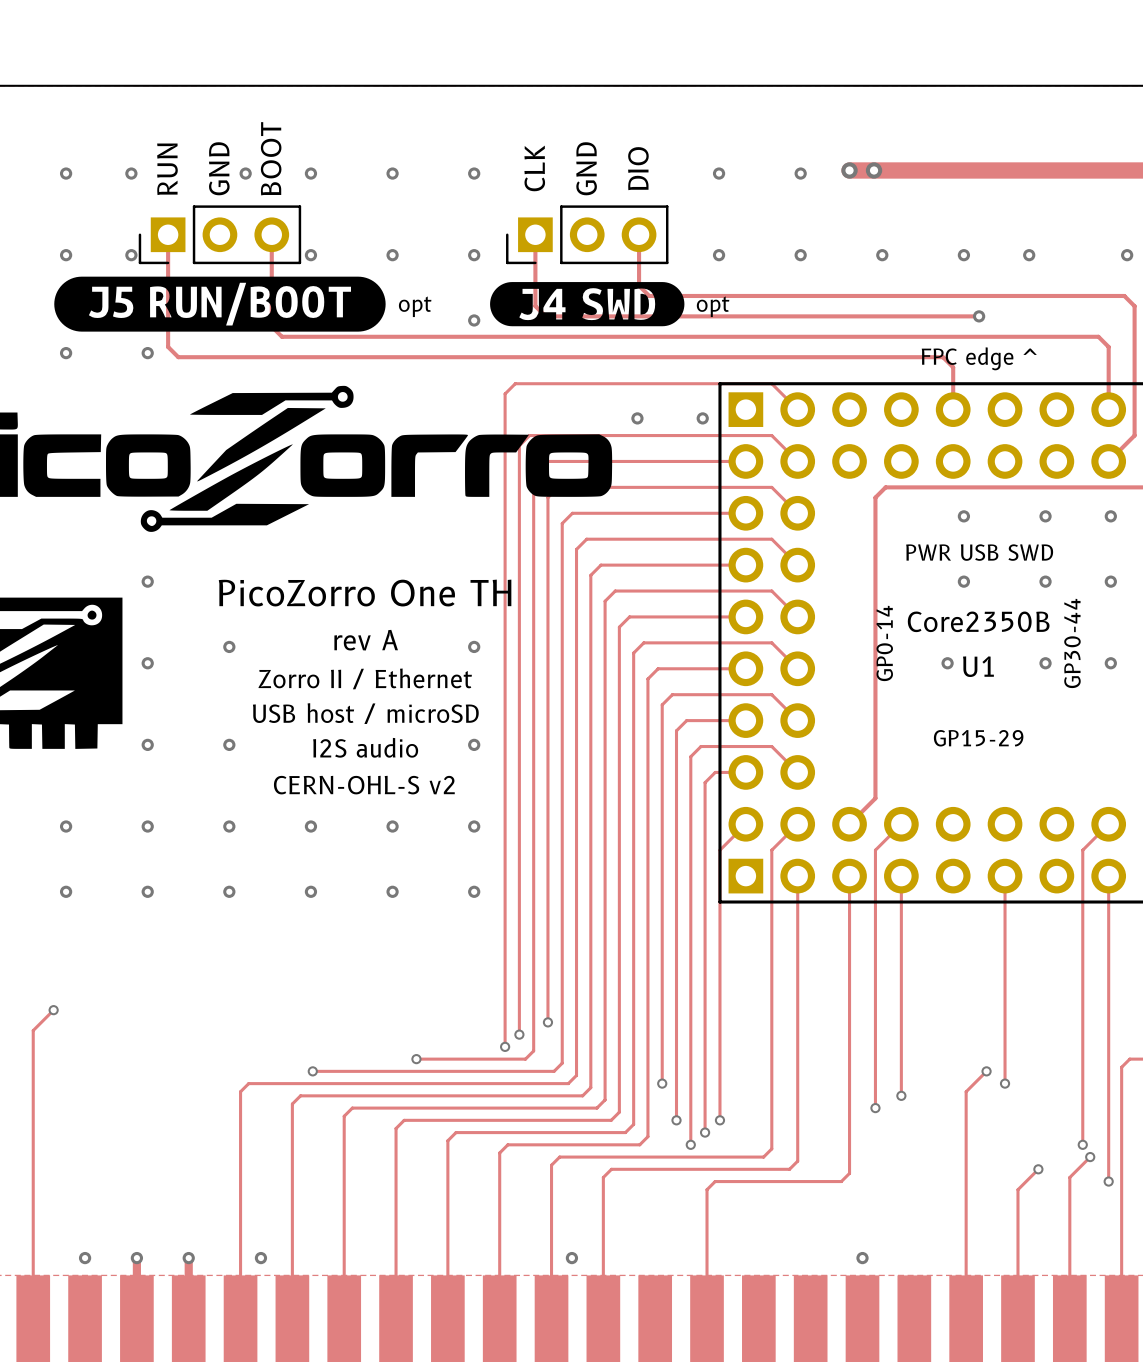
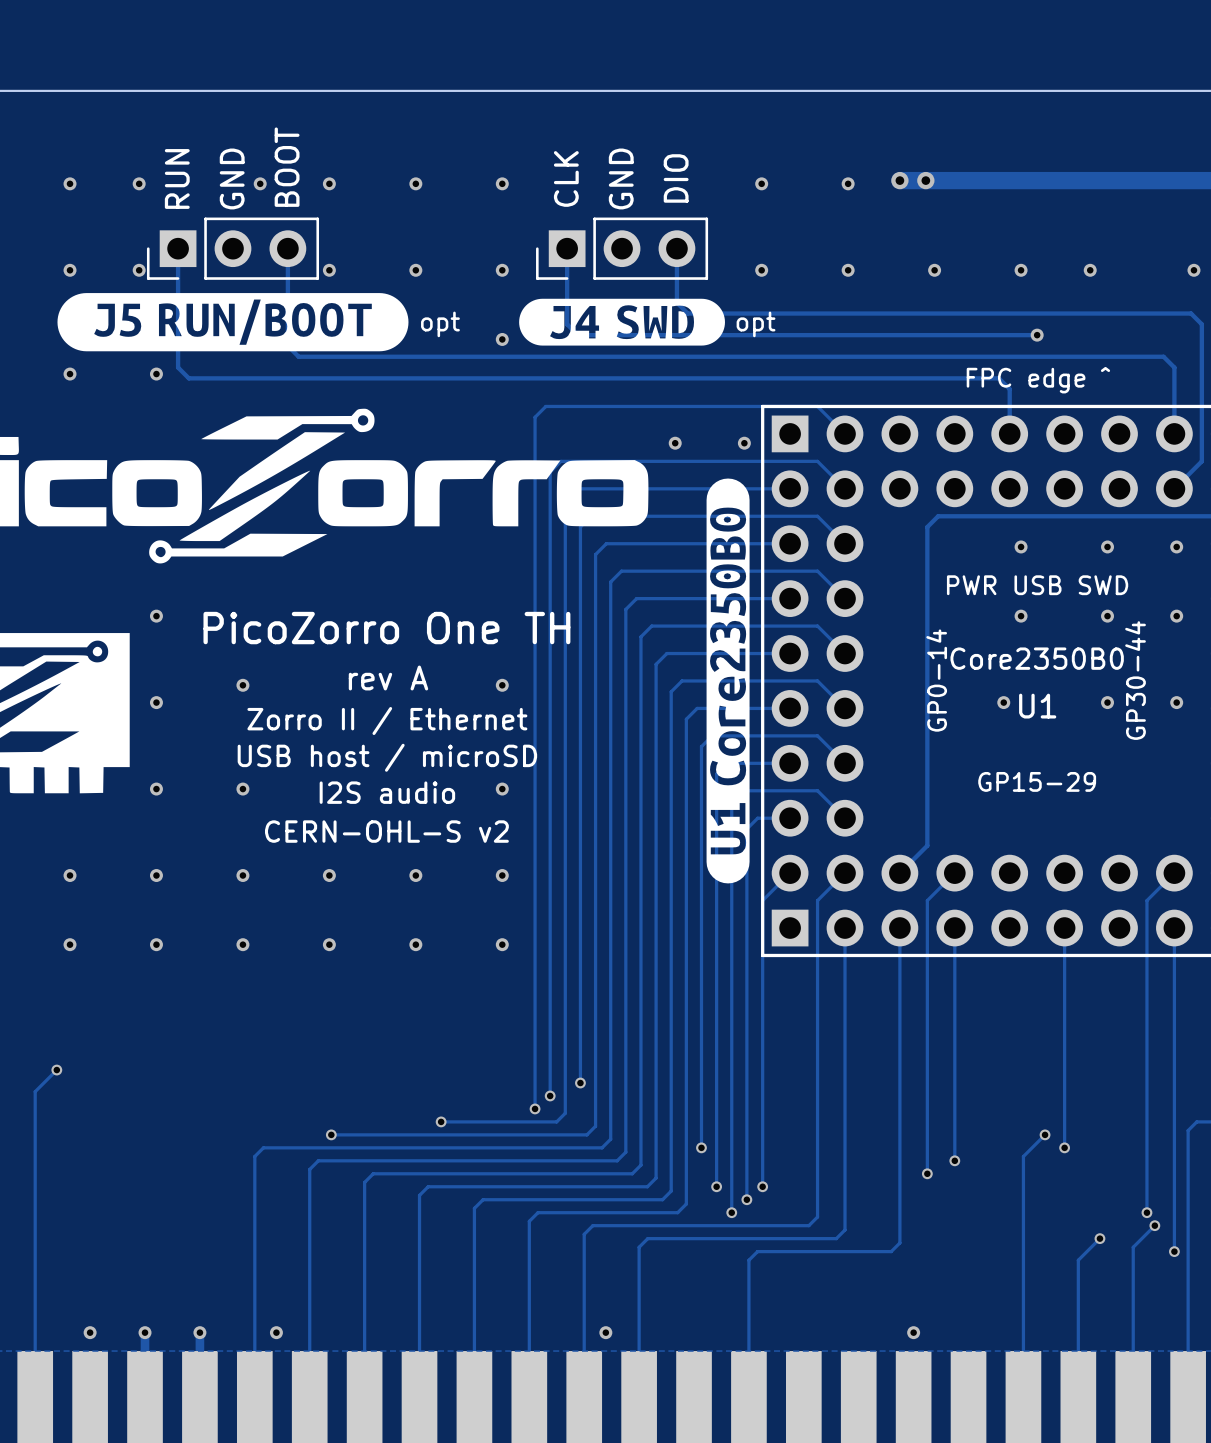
drawing: none -> [706, 478, 750, 884]
text: Core2350B (978, 621) -> Core2350B0 (1037, 658)

